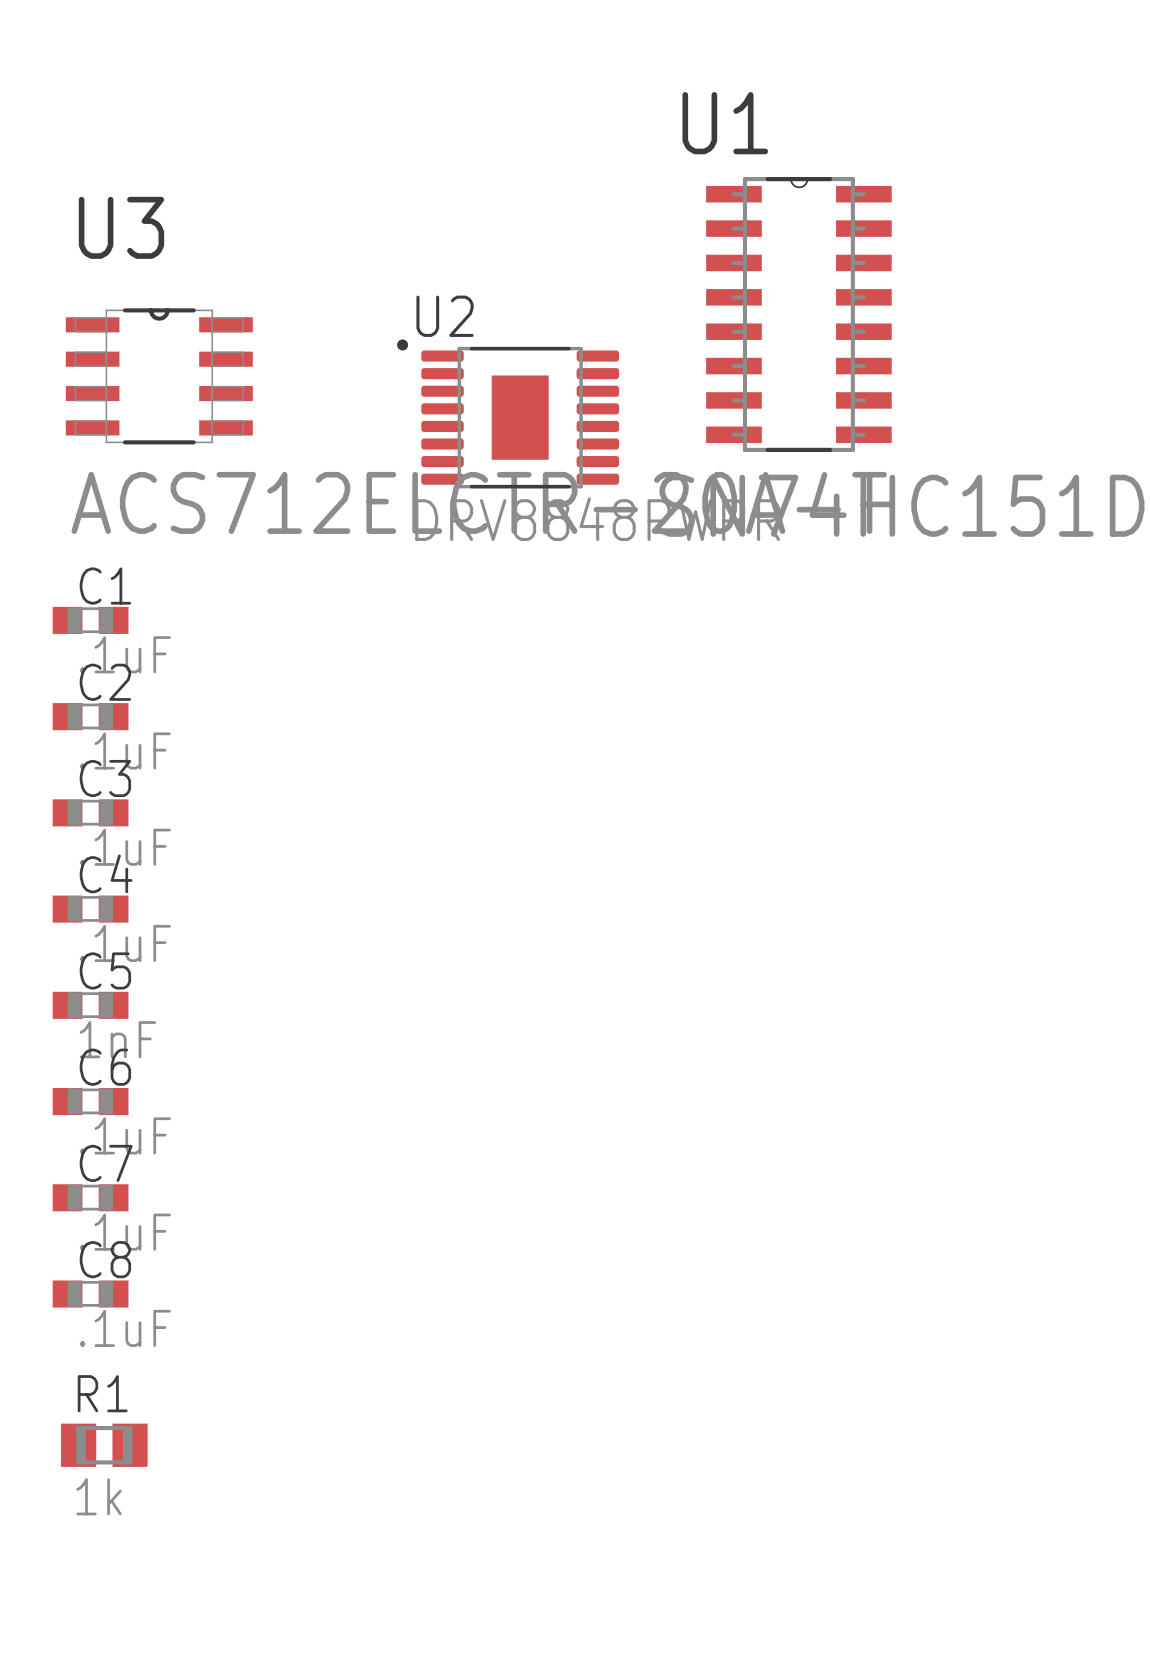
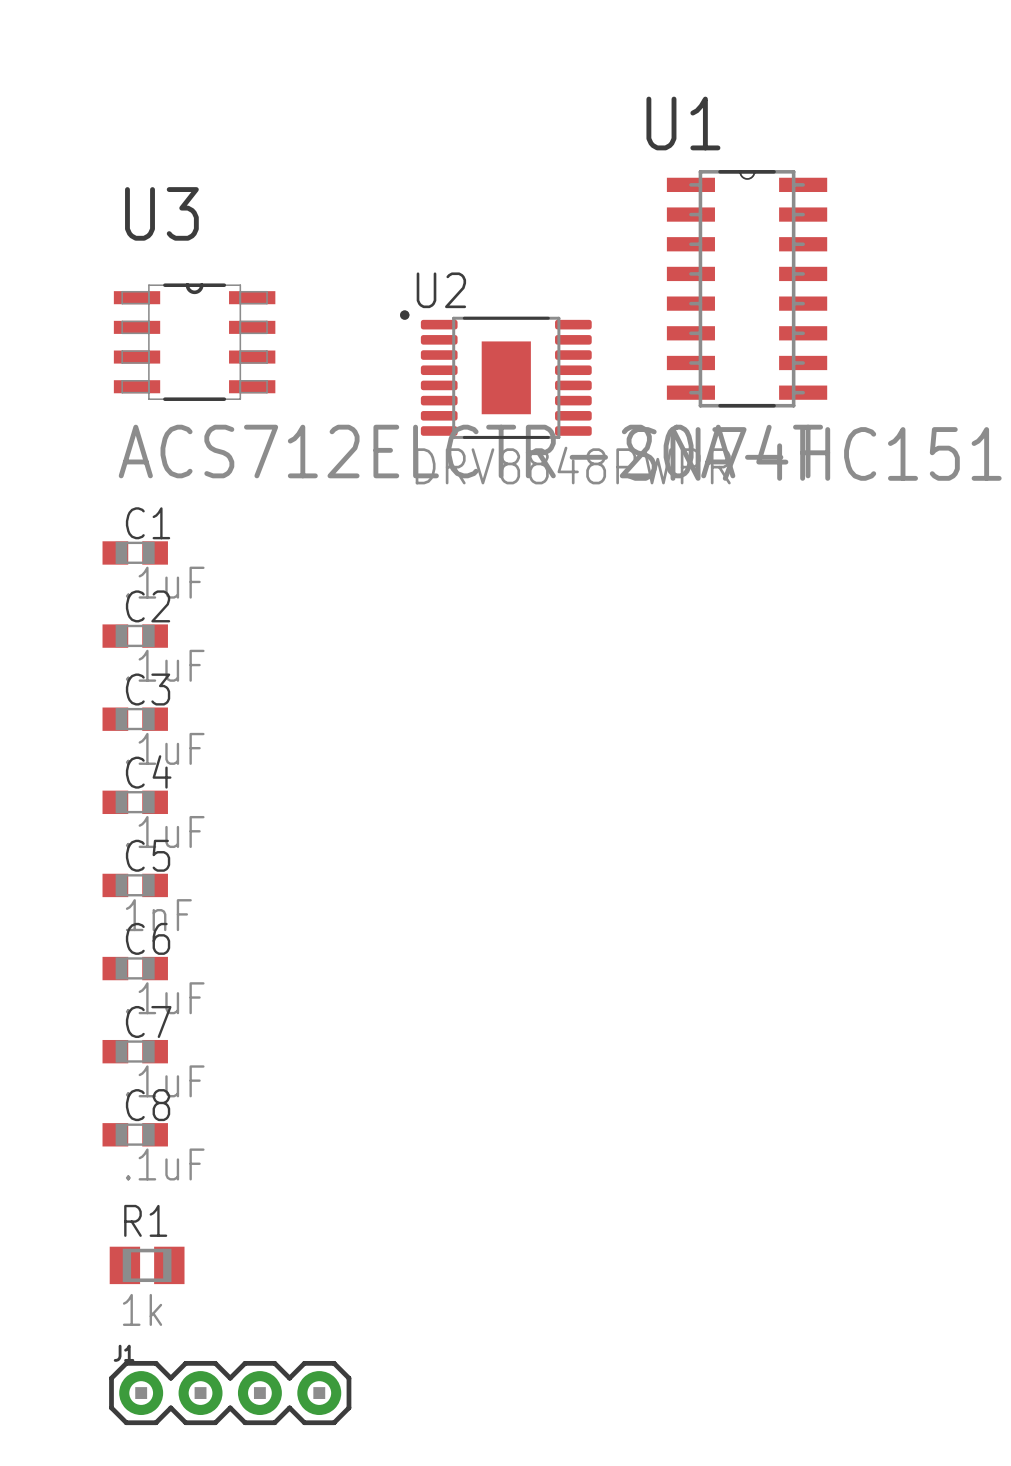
J1: none -> (230, 1393)

